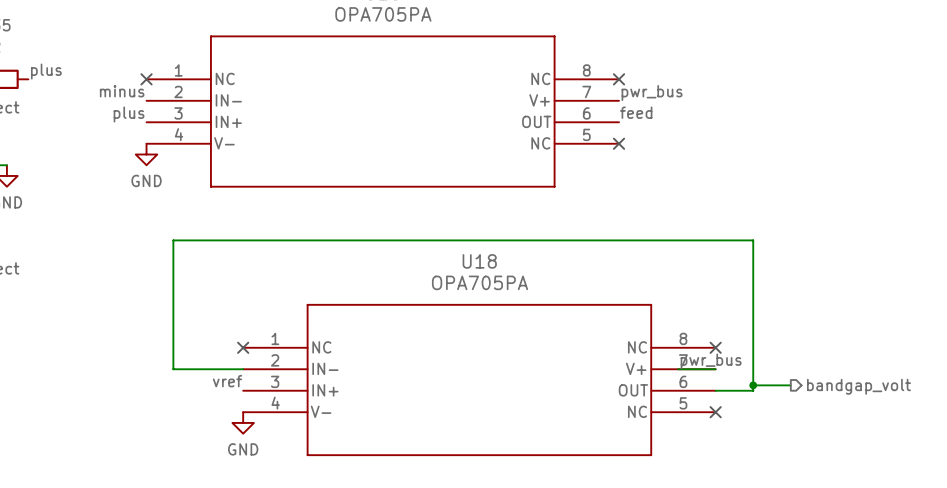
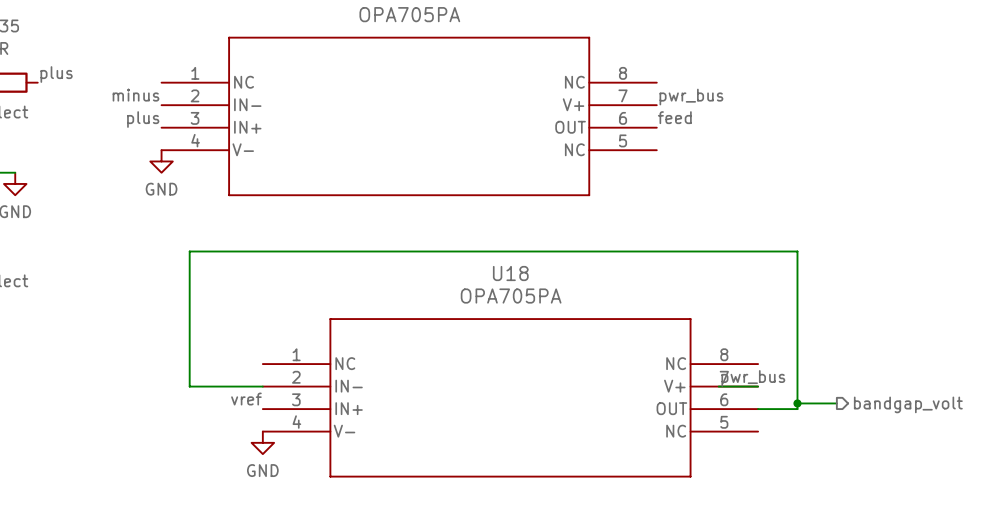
no-connect mark: (146, 79) -> none
no-connect mark: (619, 79) -> none
no-connect mark: (619, 143) -> none
no-connect mark: (243, 347) -> none
no-connect mark: (715, 347) -> none
no-connect mark: (715, 412) -> none

